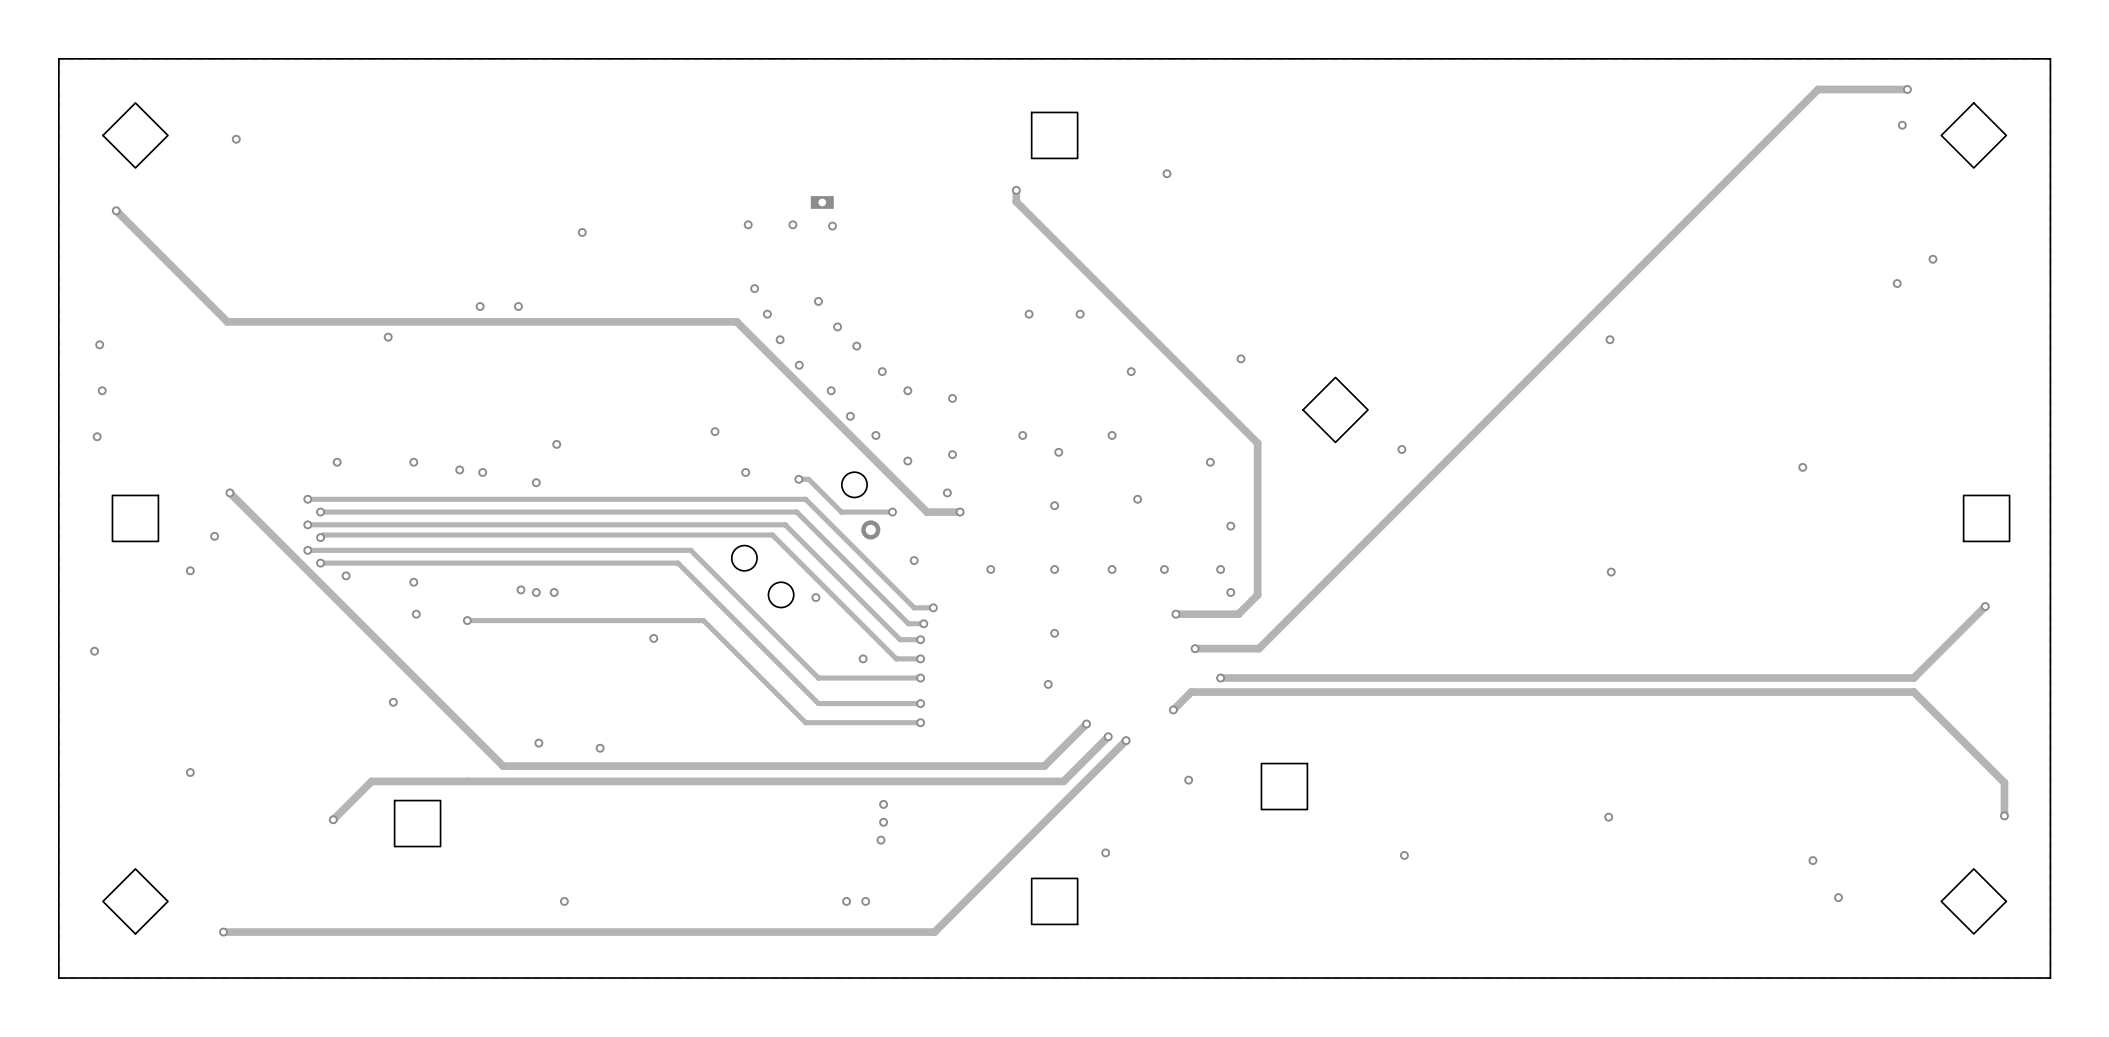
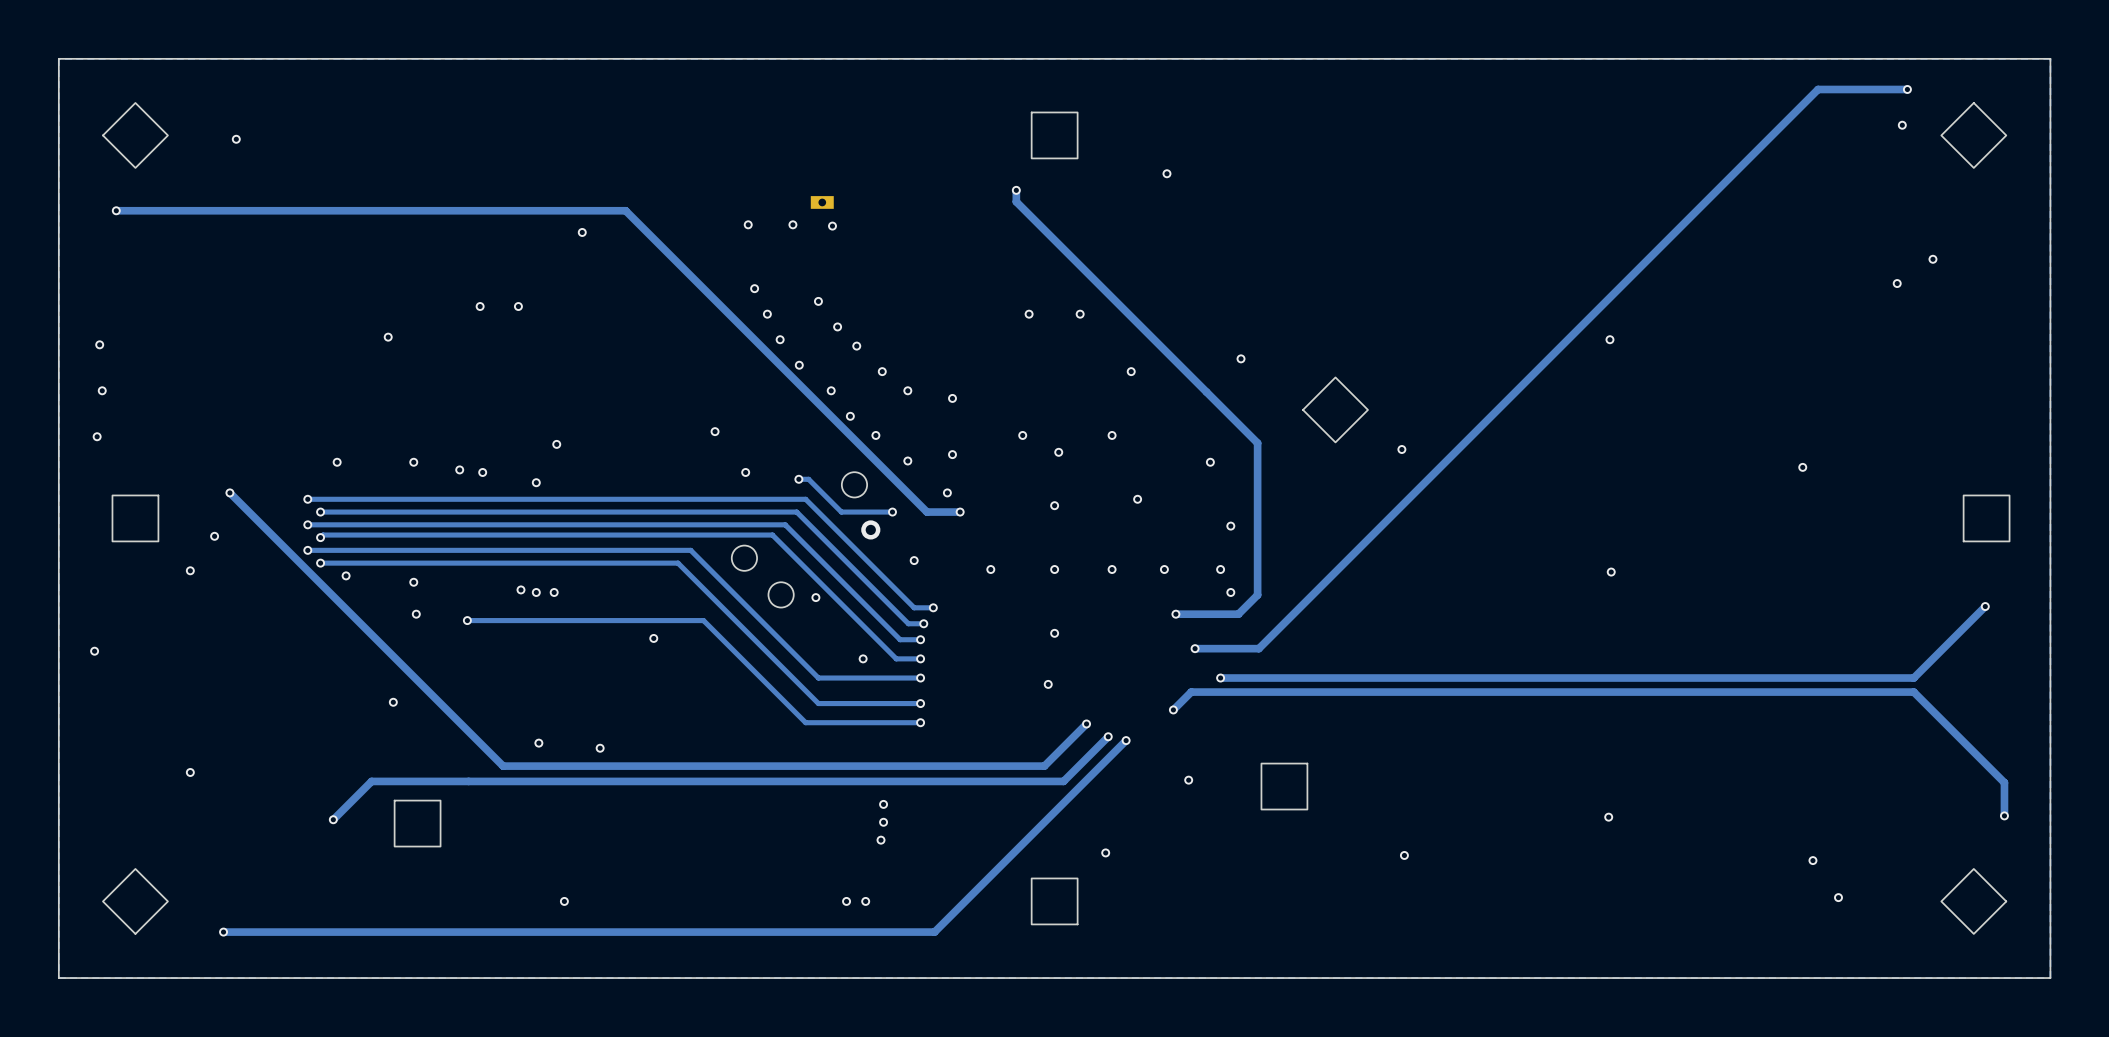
track: (116, 210) (227, 321) (736, 321) -> (116, 210) (625, 210) (736, 321)

